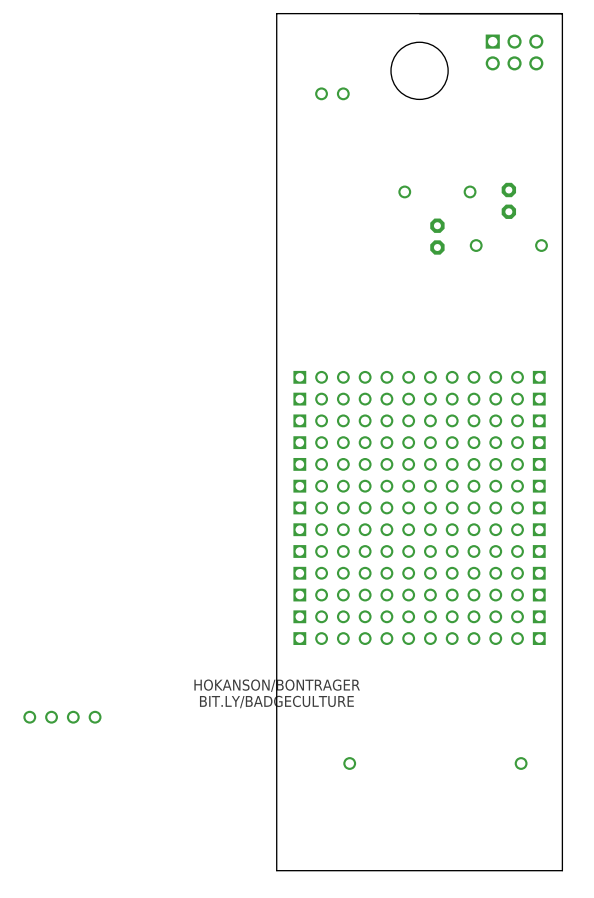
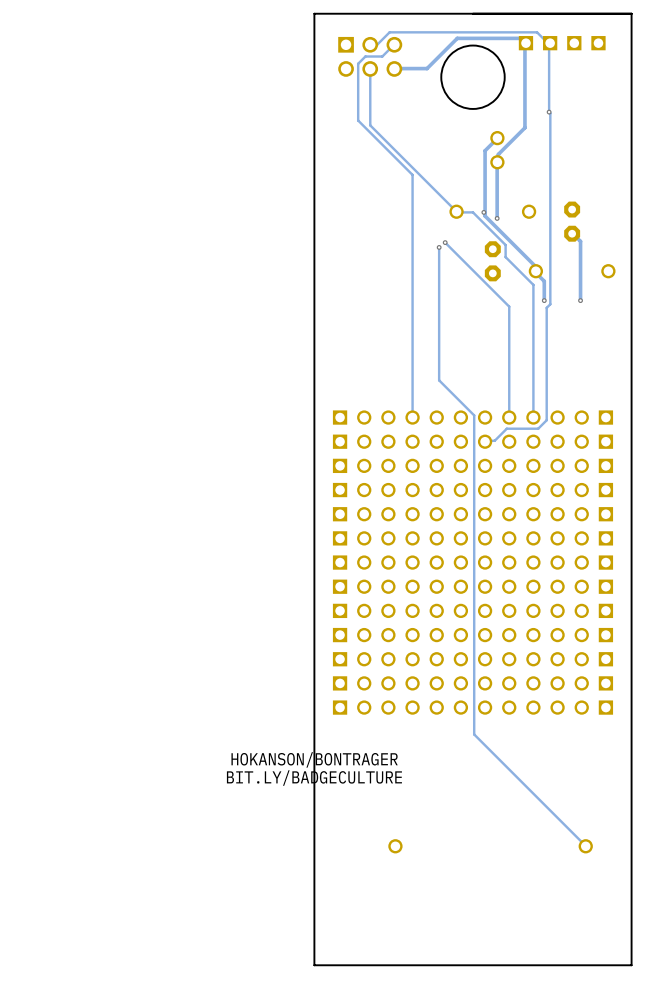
part: none -> (562, 43)
track: none -> (370, 44) (377, 44) (389, 32) (537, 32) (550, 43) (550, 304) (546, 307) (546, 420) (538, 428) (506, 428) (494, 440) (485, 441)
track: none -> (394, 44) (382, 56) (365, 56) (358, 63) (358, 120) (412, 174) (412, 417)
part position: (514, 52) -> (370, 56)
track: none -> (370, 68) (370, 125) (457, 212) (472, 212) (505, 245) (505, 257) (533, 284) (533, 417)
track: none -> (394, 68) (427, 68) (457, 38) (520, 38) (525, 43) (524, 127) (498, 154) (497, 218)
part rotation: 0° (332, 93) -> 90° clockwise (497, 150)
part position: (332, 93) -> (497, 150)
via: none -> (549, 112)
track: none -> (497, 138) (485, 150) (485, 216) (535, 266) (535, 272) (544, 281) (544, 300)
via: none -> (483, 212)
via: none -> (497, 218)
track: none -> (572, 233) (580, 241) (580, 300)
track: none -> (445, 242) (509, 306) (509, 417)
via: none -> (445, 242)
track: none -> (439, 247) (439, 380) (474, 415) (474, 734) (585, 846)
via: none -> (439, 247)
via: none -> (544, 300)
via: none -> (580, 300)
part: (29, 717) -> none
part: (51, 717) -> none
part: (73, 717) -> none
part: (95, 717) -> none

